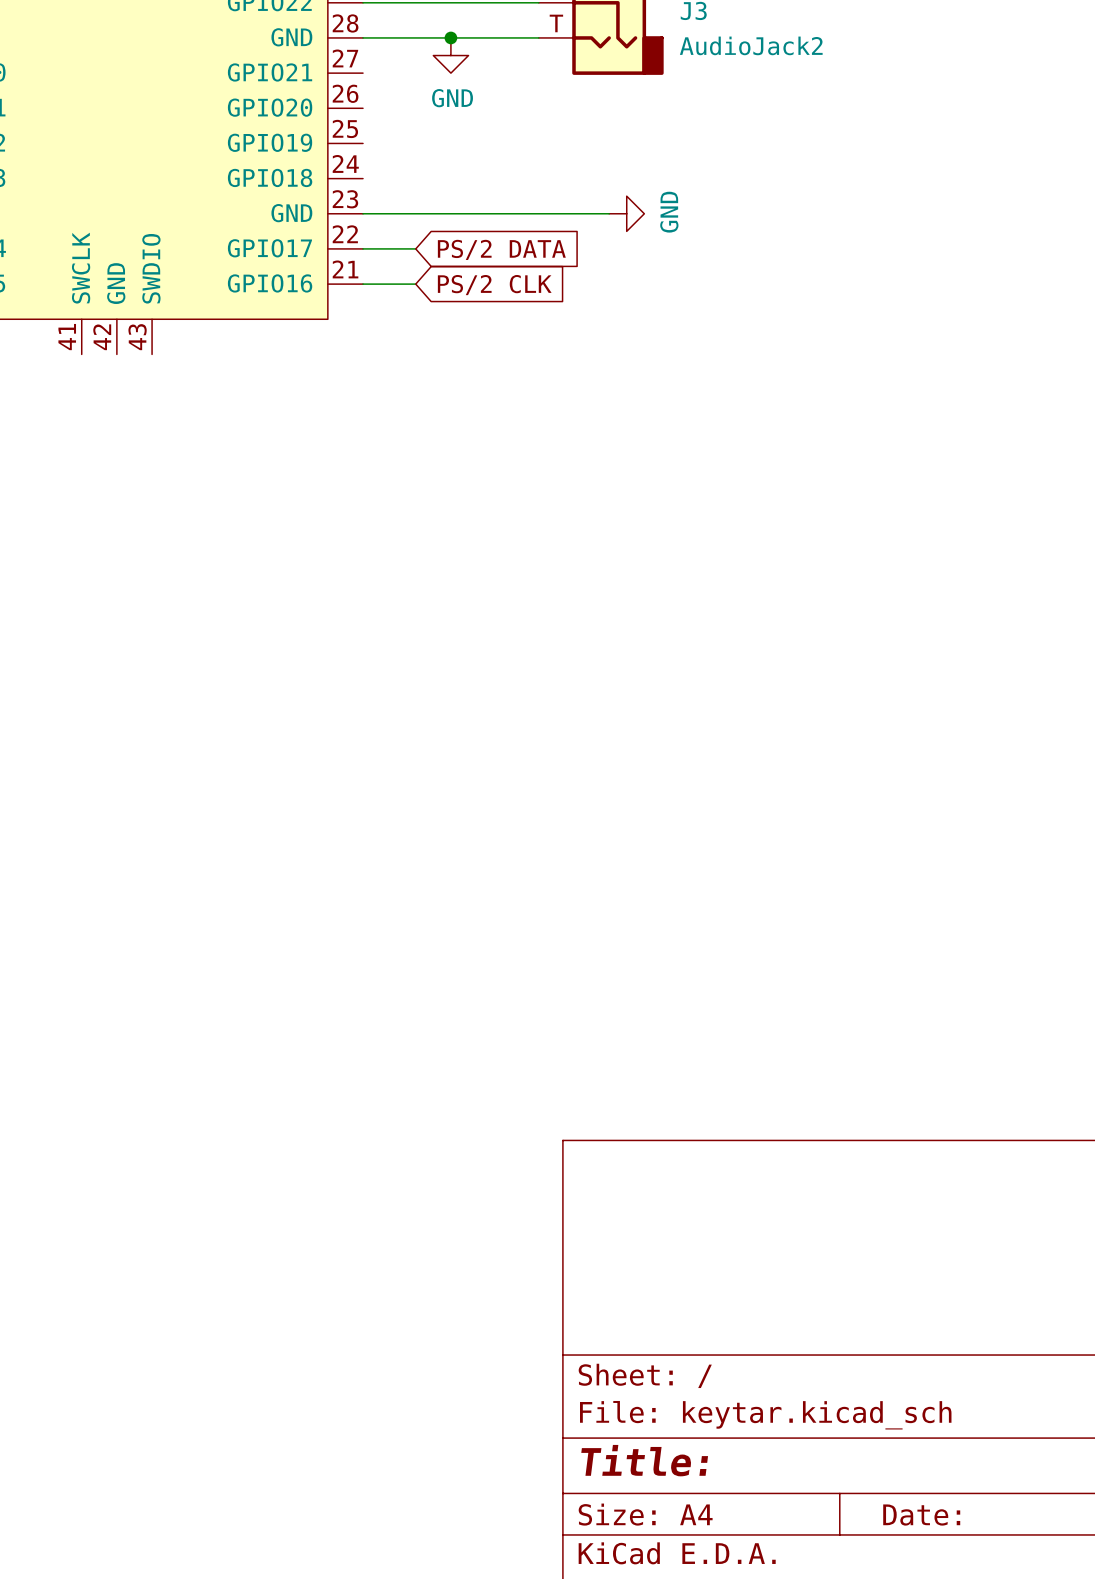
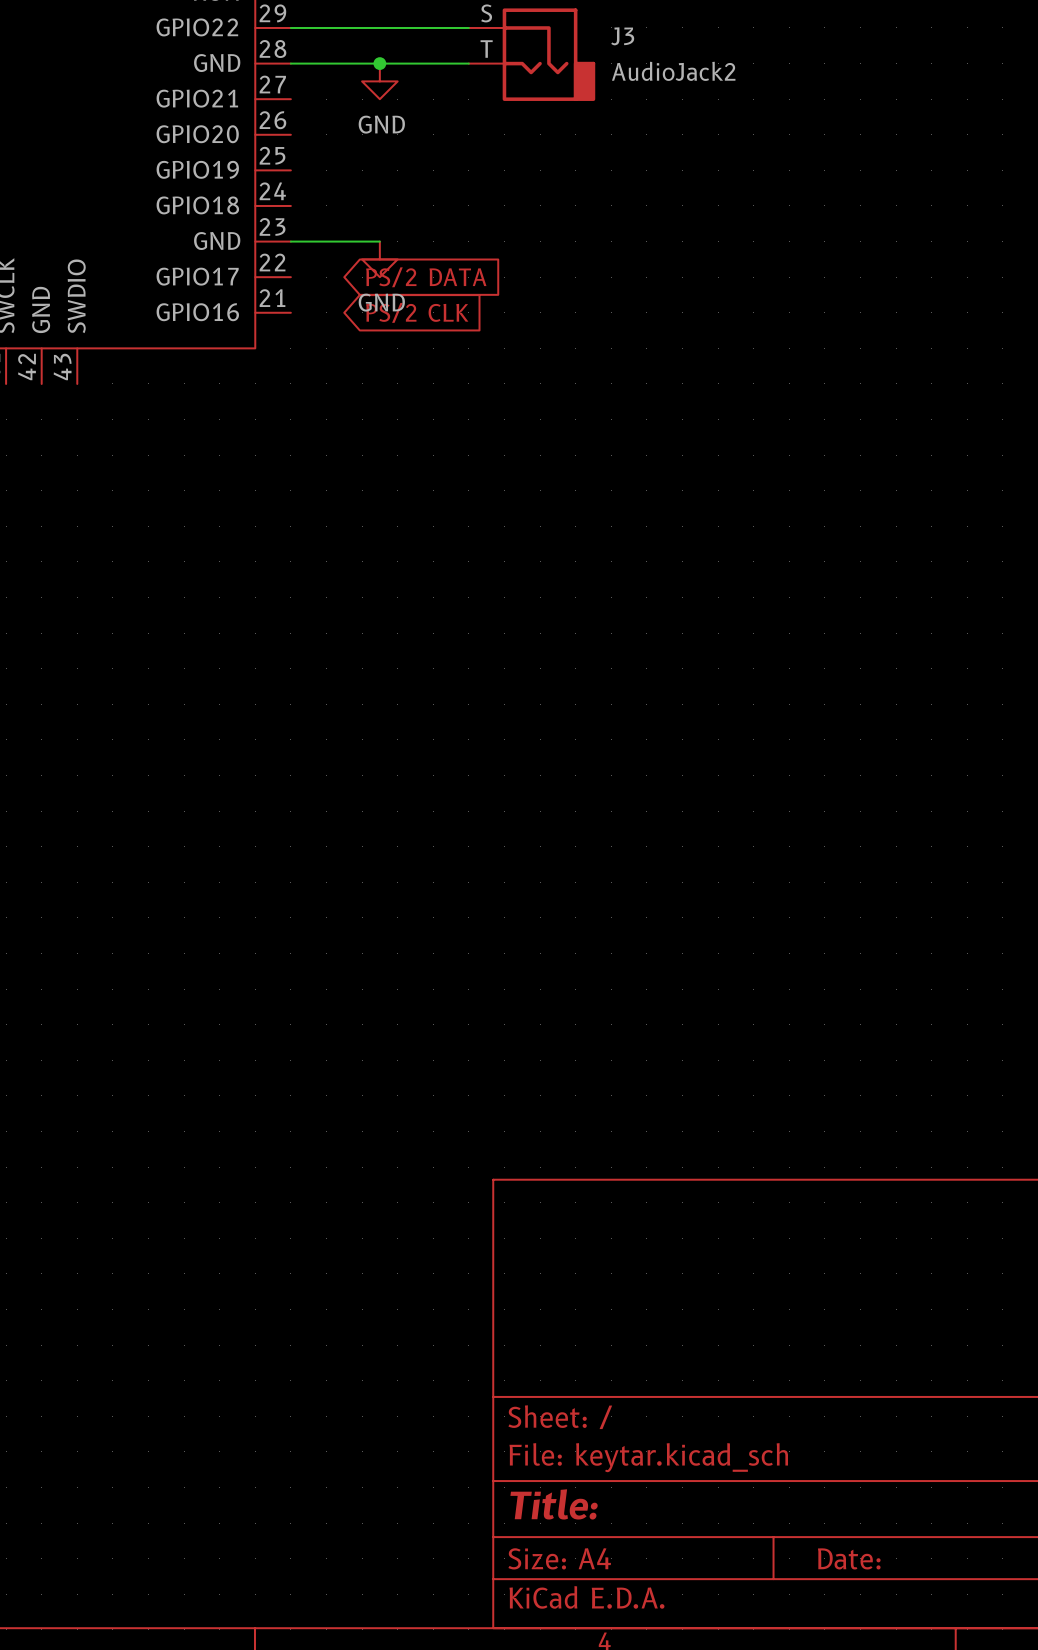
wire: (450, 213) (609, 213) -> none
power symbol rotation: 0° (626, 213) -> 90° clockwise (379, 259)
power symbol position: GND (626, 213) -> GND (379, 259)
wire: (363, 248) (415, 248) -> none
wire: (363, 284) (415, 284) -> none

